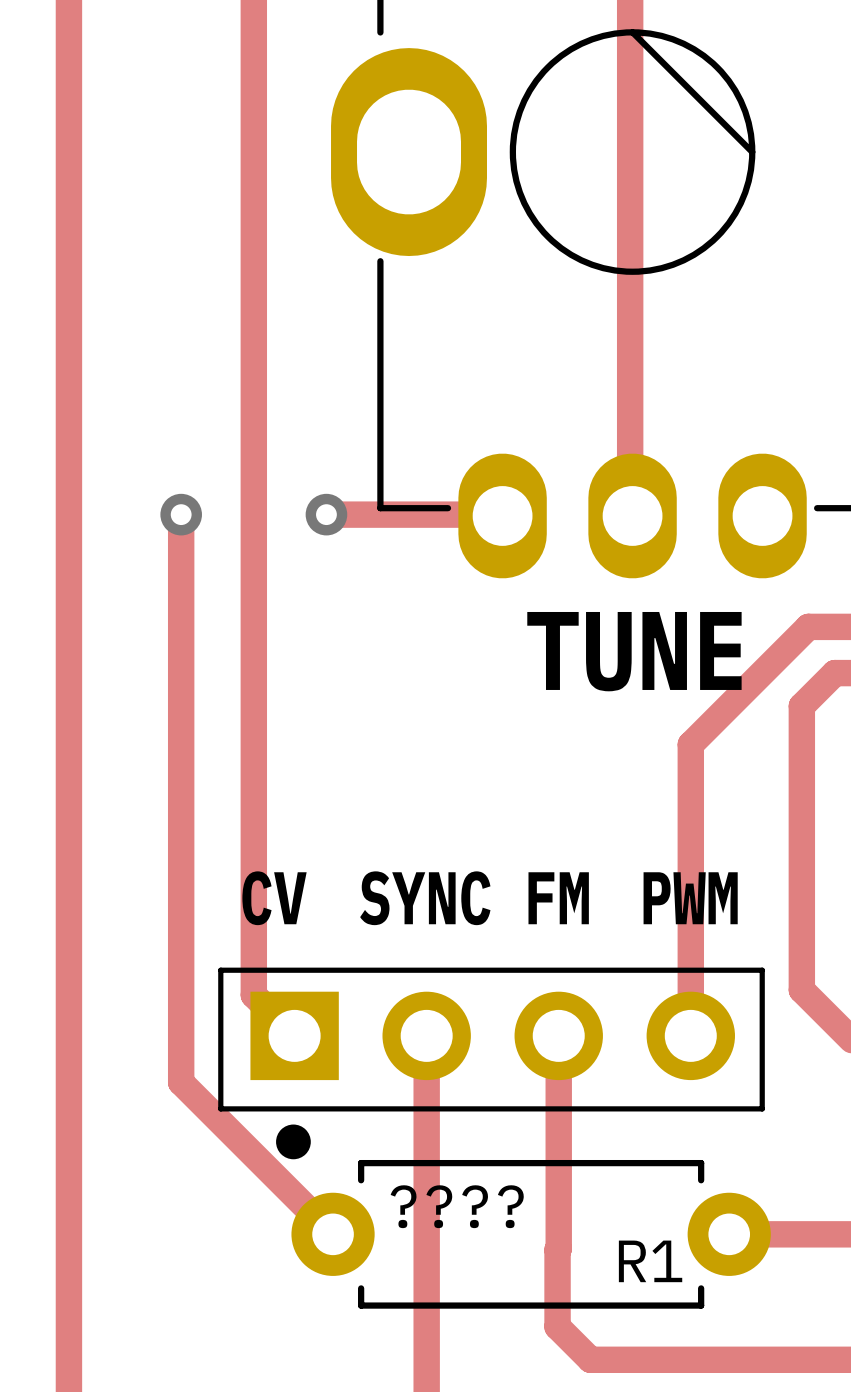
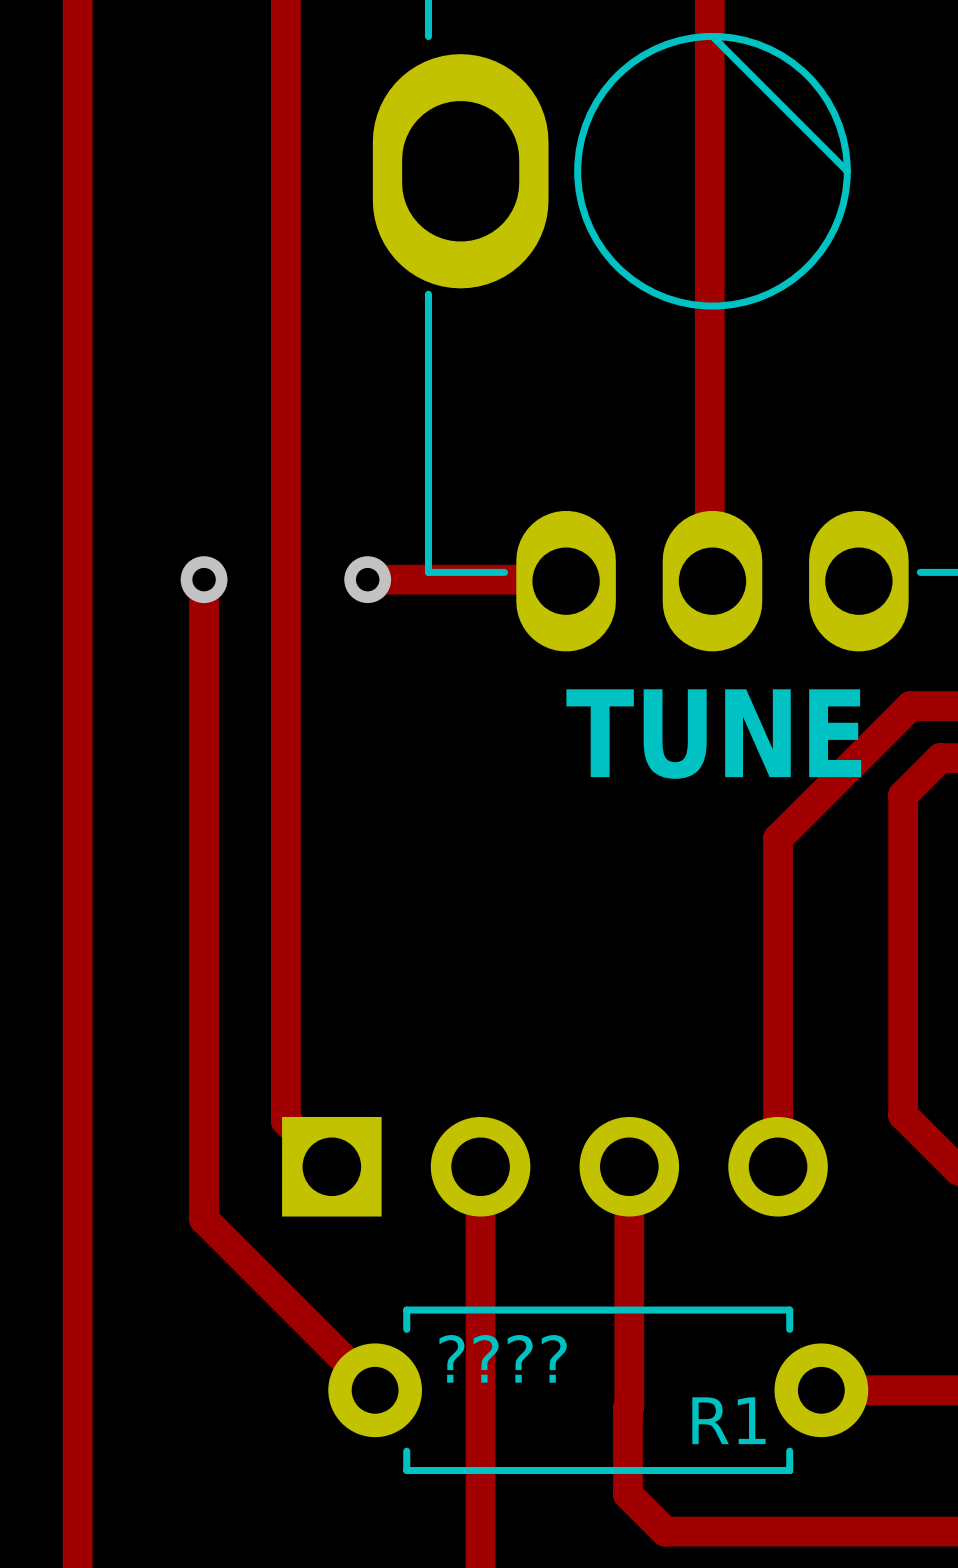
text: CV (274, 898) -> none
text: SYNC (425, 898) -> none
text: FM (558, 898) -> none
text: PWM (690, 898) -> none
line: (220, 970) (762, 970) (762, 1108) (220, 1108) (220, 970) -> none
drawing: [276, 1124, 311, 1160] -> none

